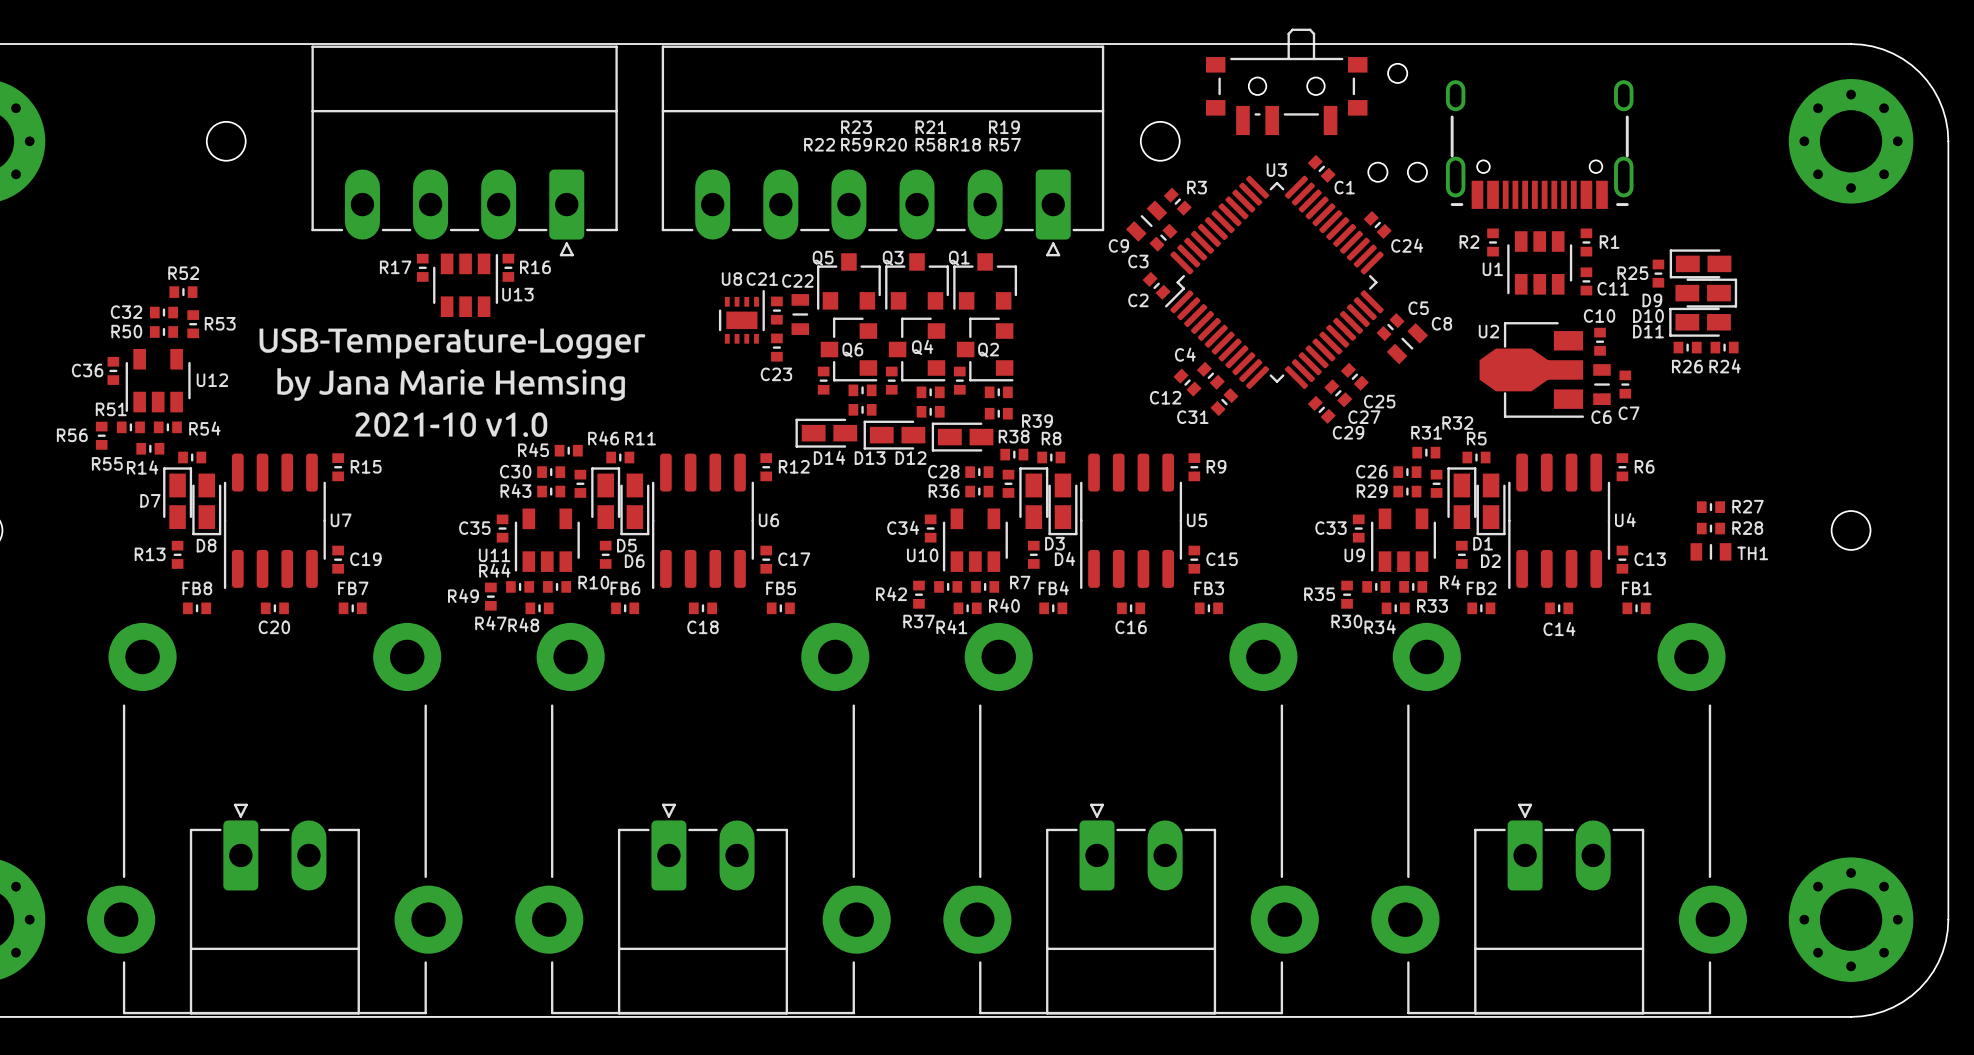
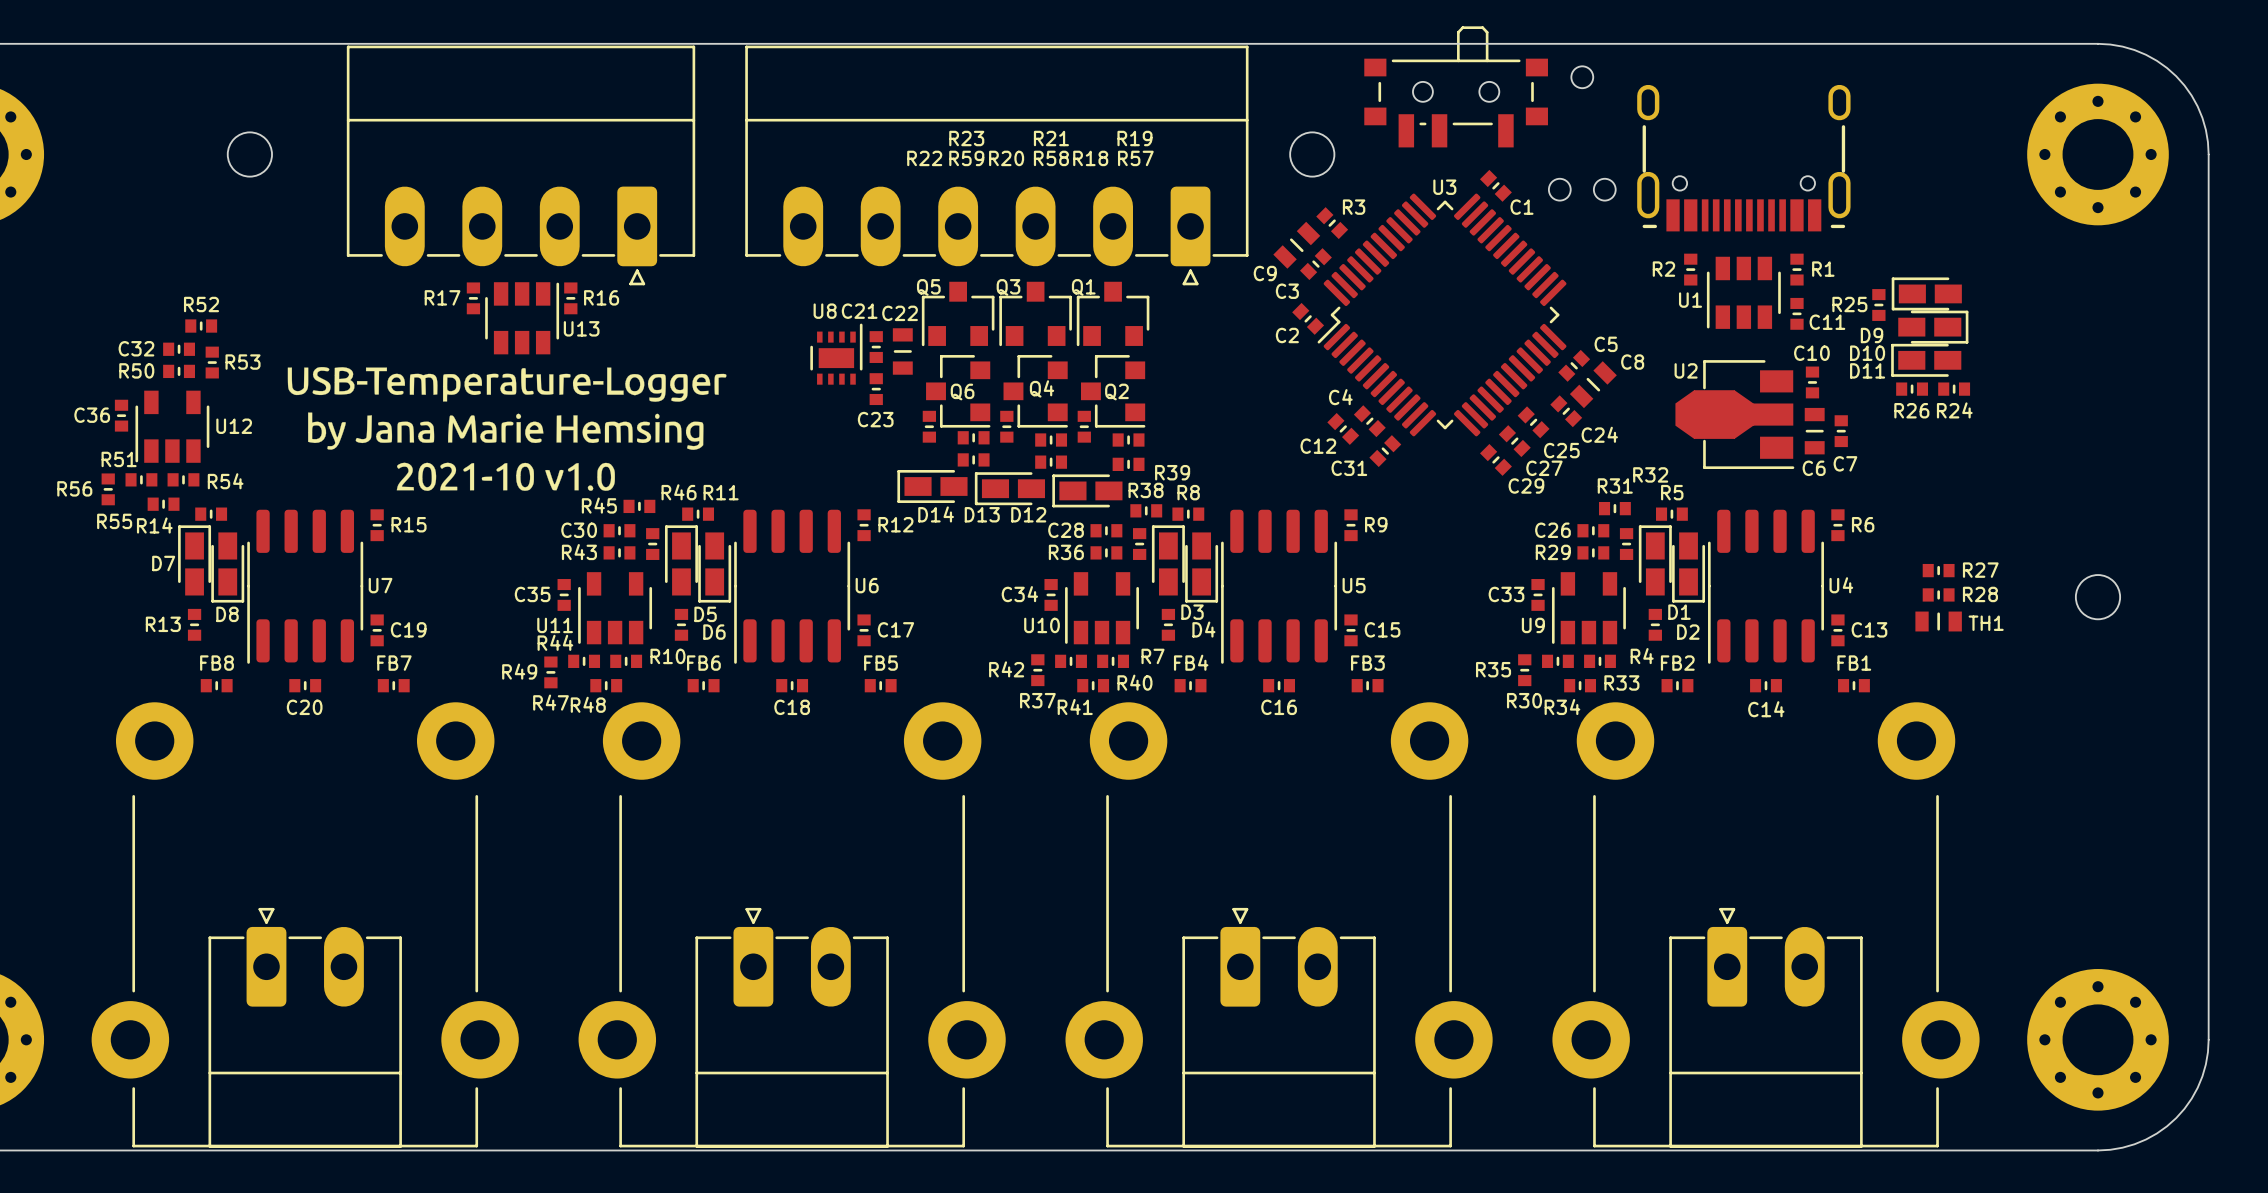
C24 position: (1377, 224) -> (1566, 411)

